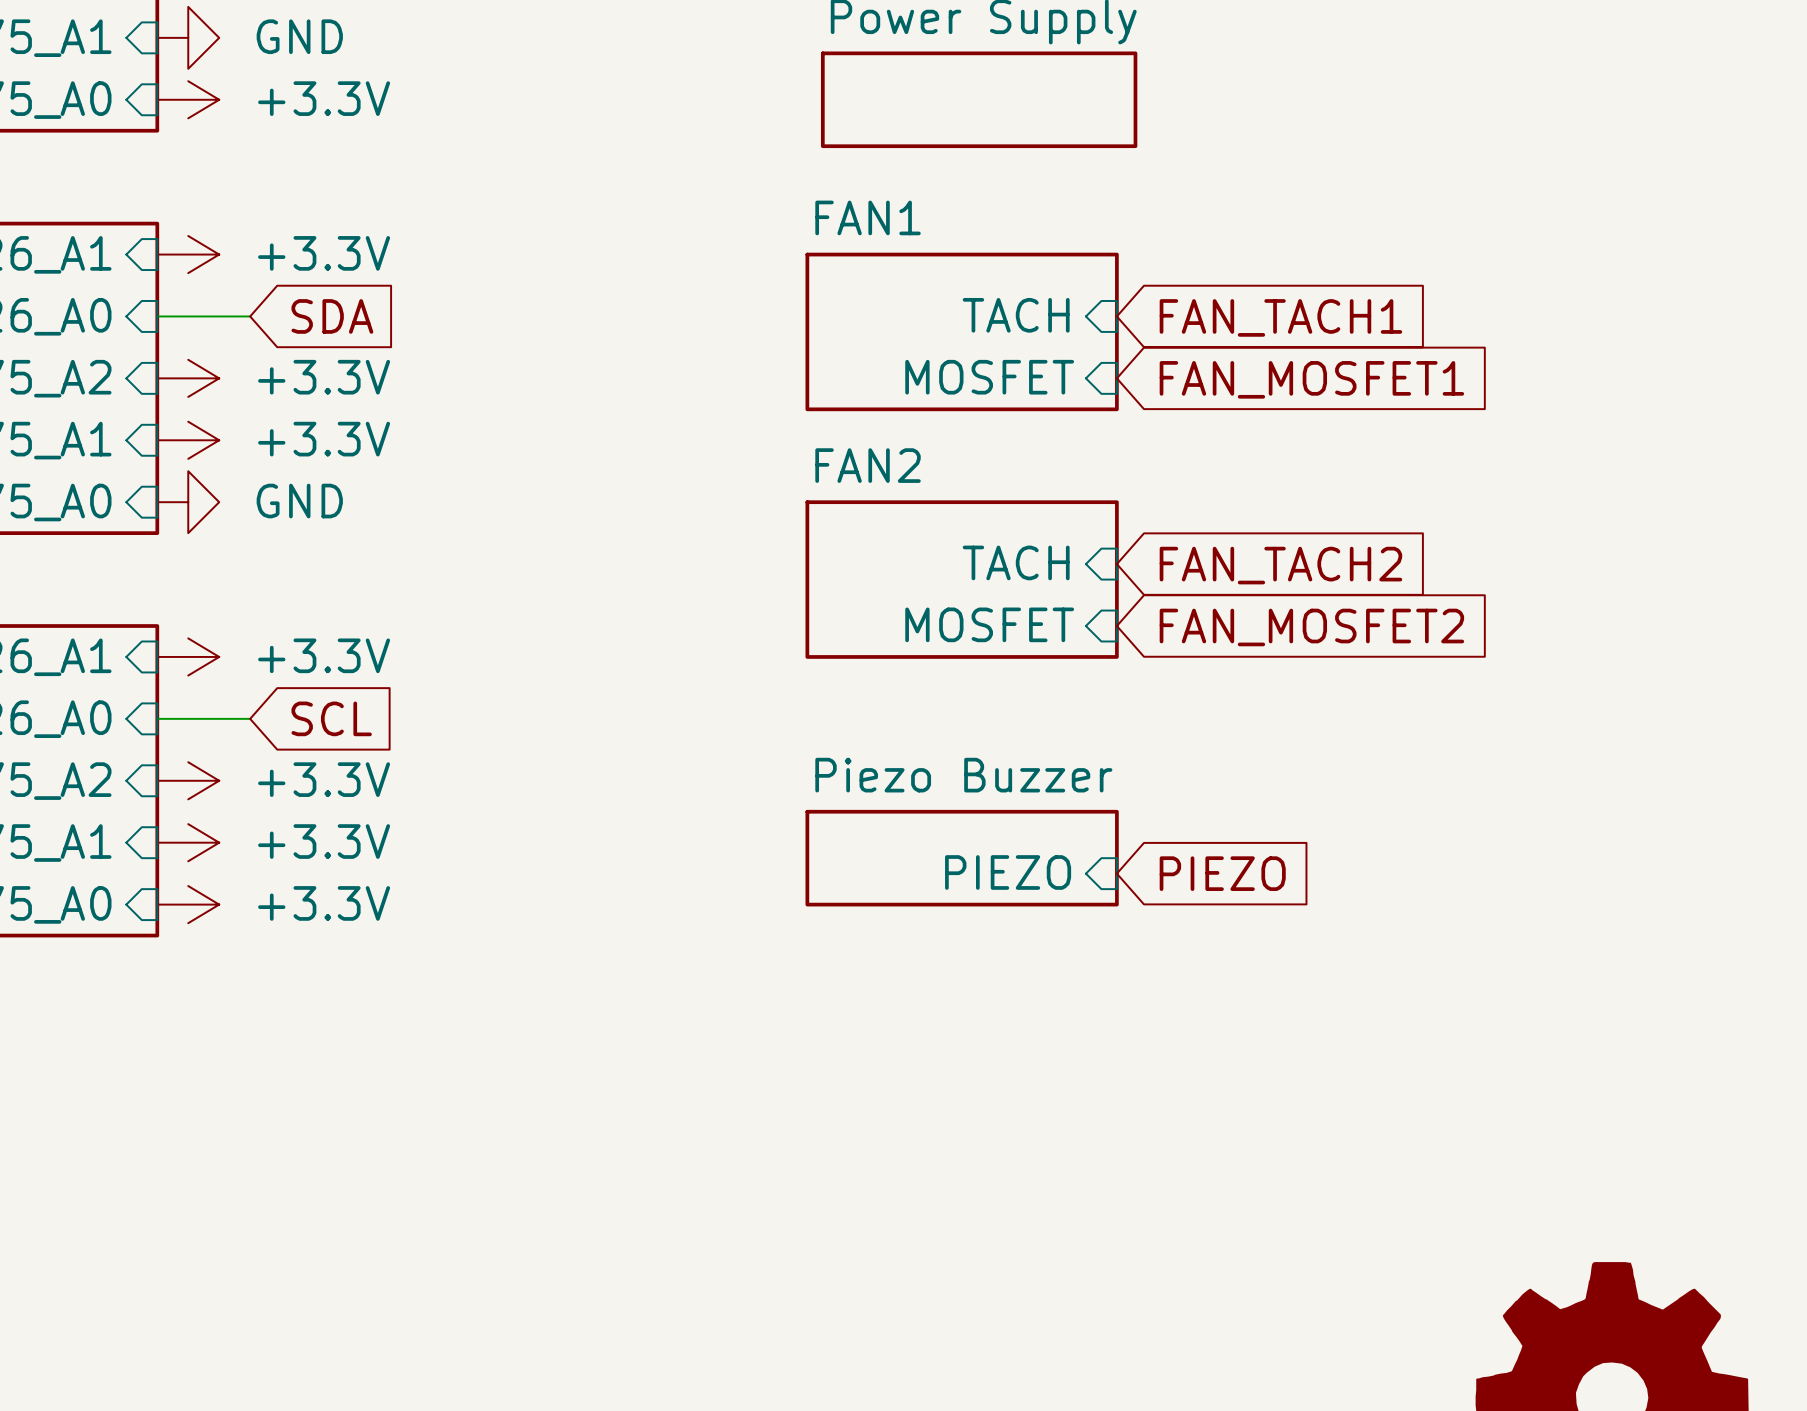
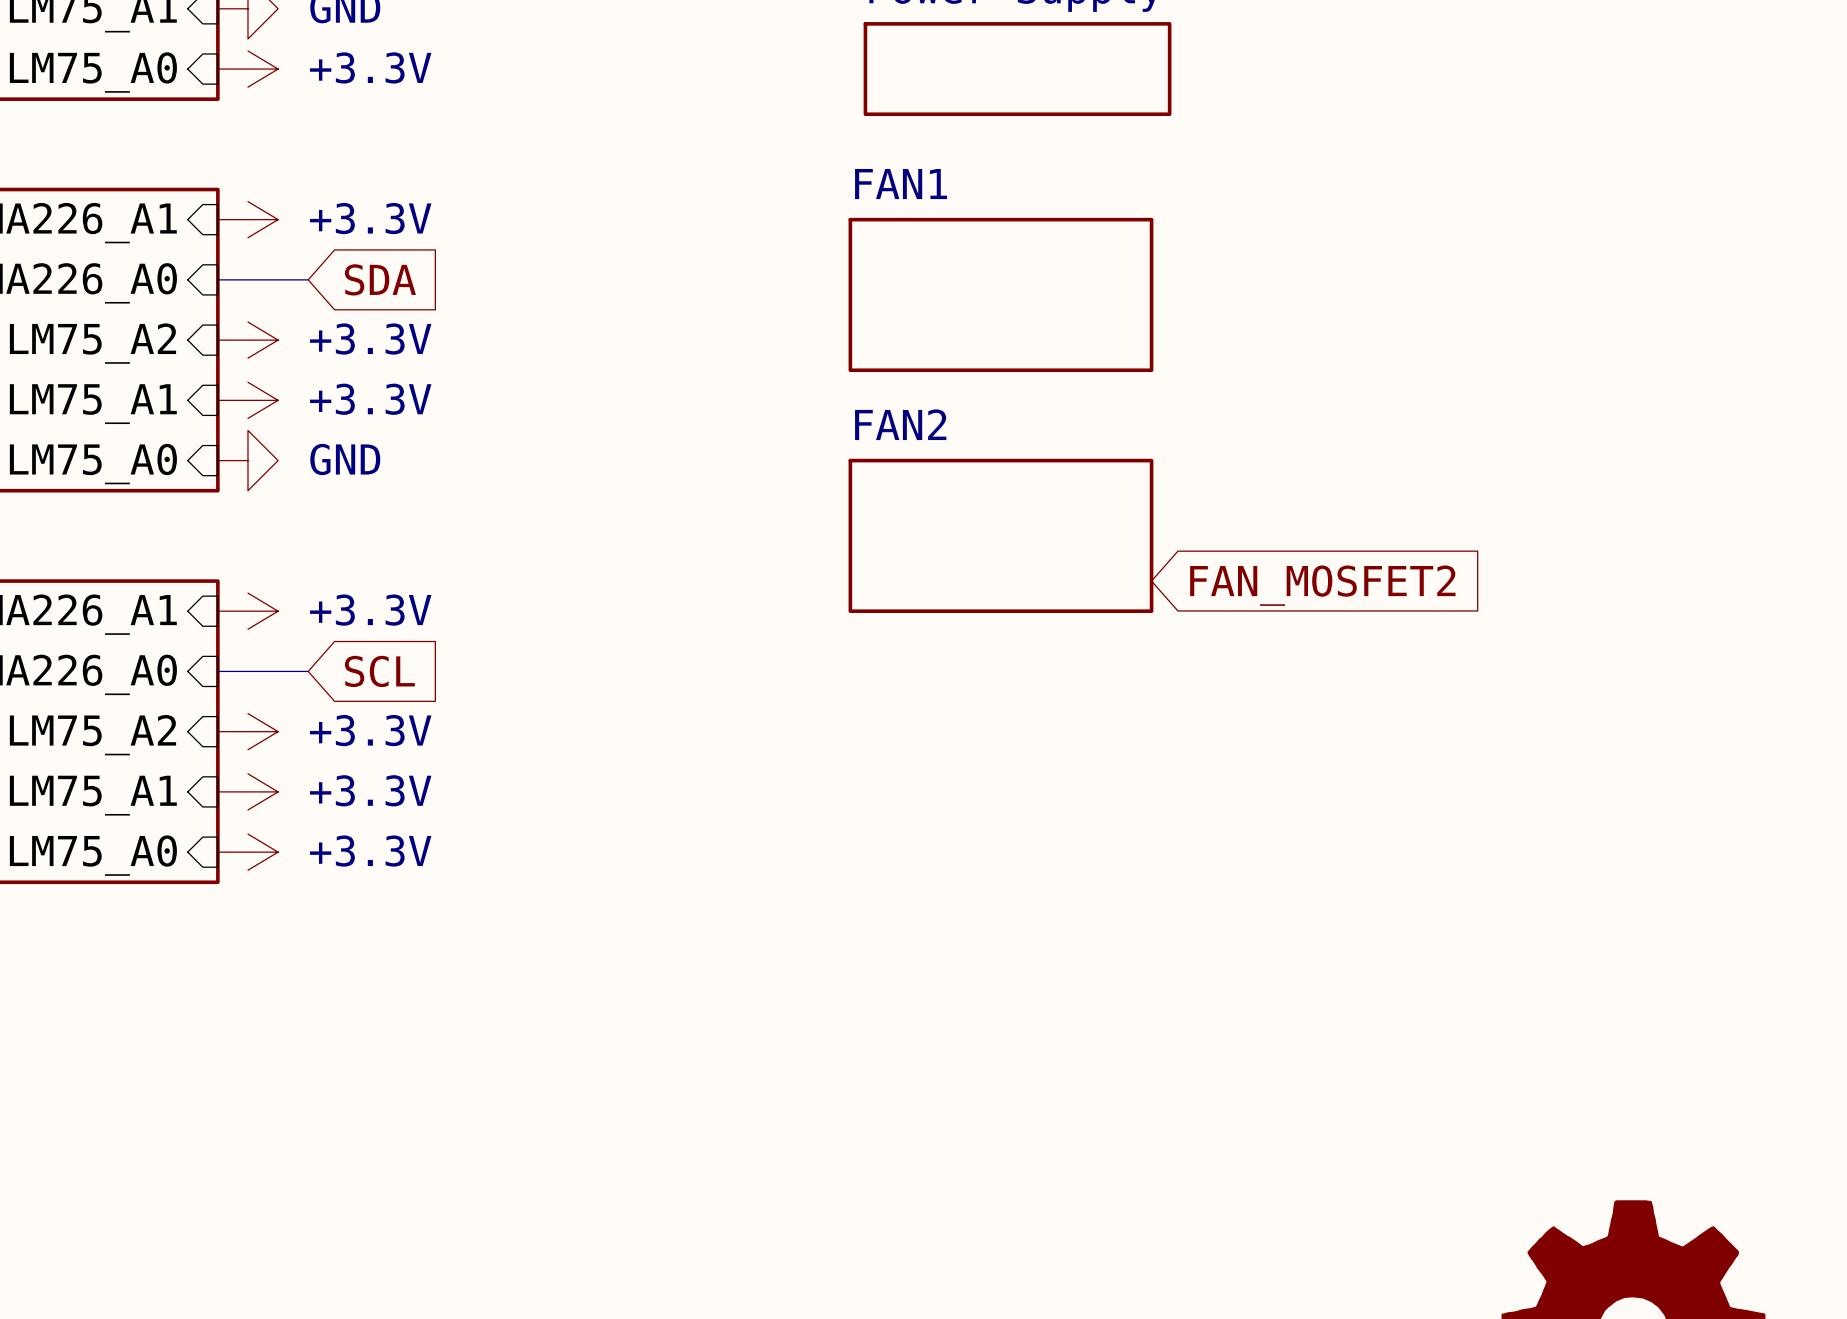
sheet pin: TACH (1016, 315) -> none
global label: FAN_TACH1 (1280, 317) -> none
sheet pin: MOSFET (989, 377) -> none
global label: FAN_MOSFET1 (1311, 379) -> none
sheet pin: TACH (1016, 562) -> none
global label: FAN_TACH2 (1280, 565) -> none
sheet pin: MOSFET (989, 624) -> none
sheet Piezo Buzzer: (962, 858) -> none
sheet pin: PIEZO (1008, 872) -> none
global label: PIEZO (1222, 873) -> none

